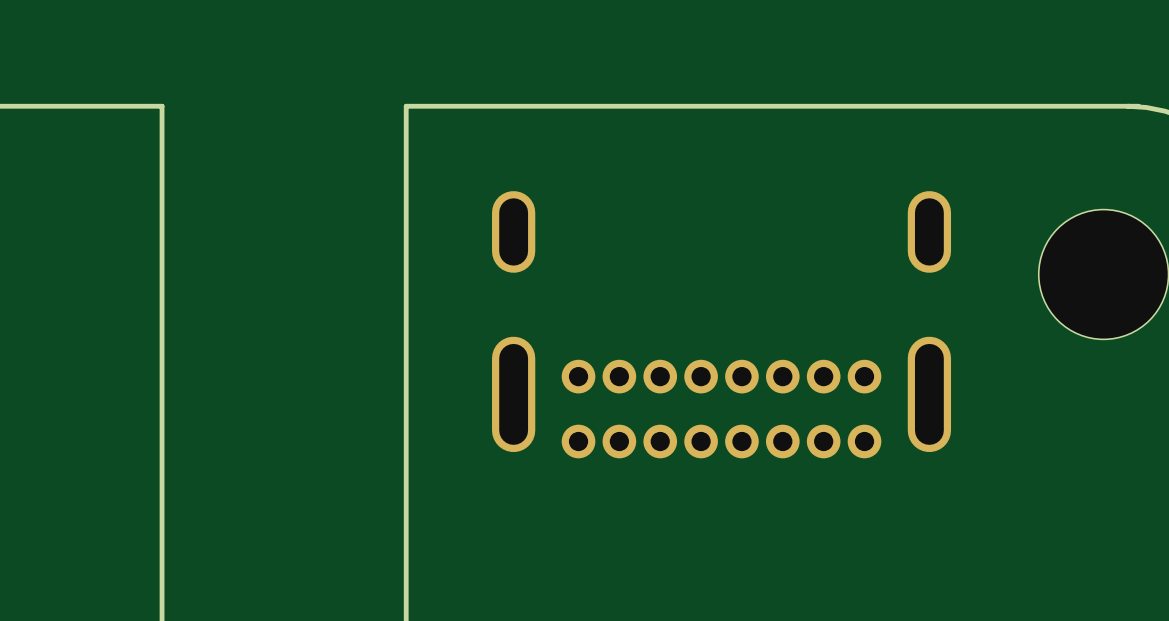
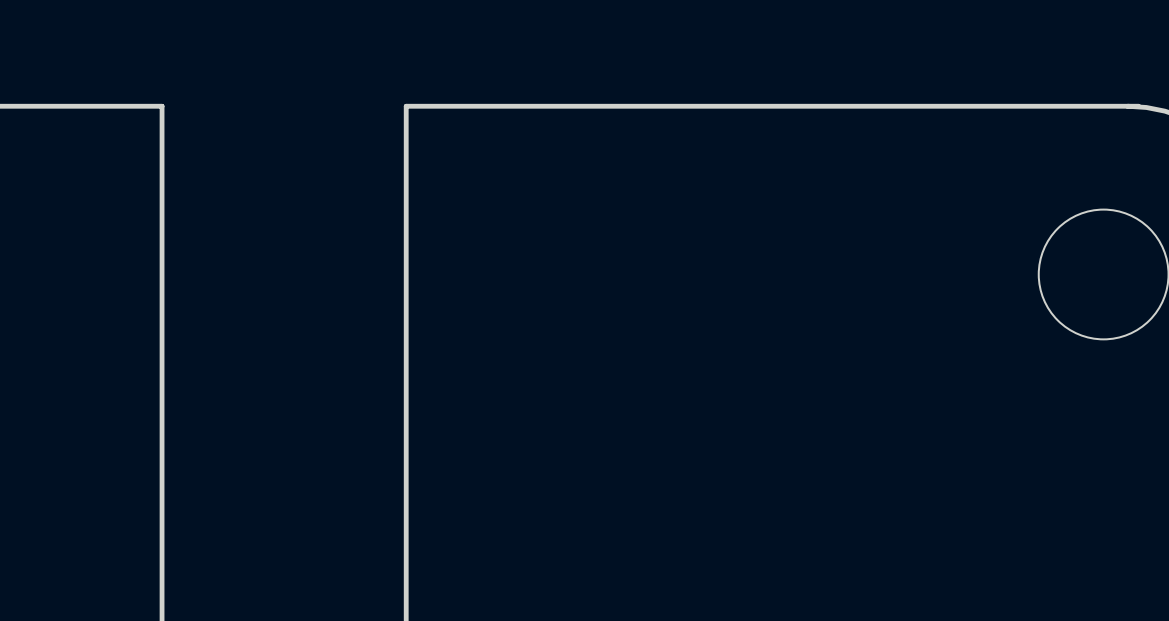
part: (721, 324) -> none

